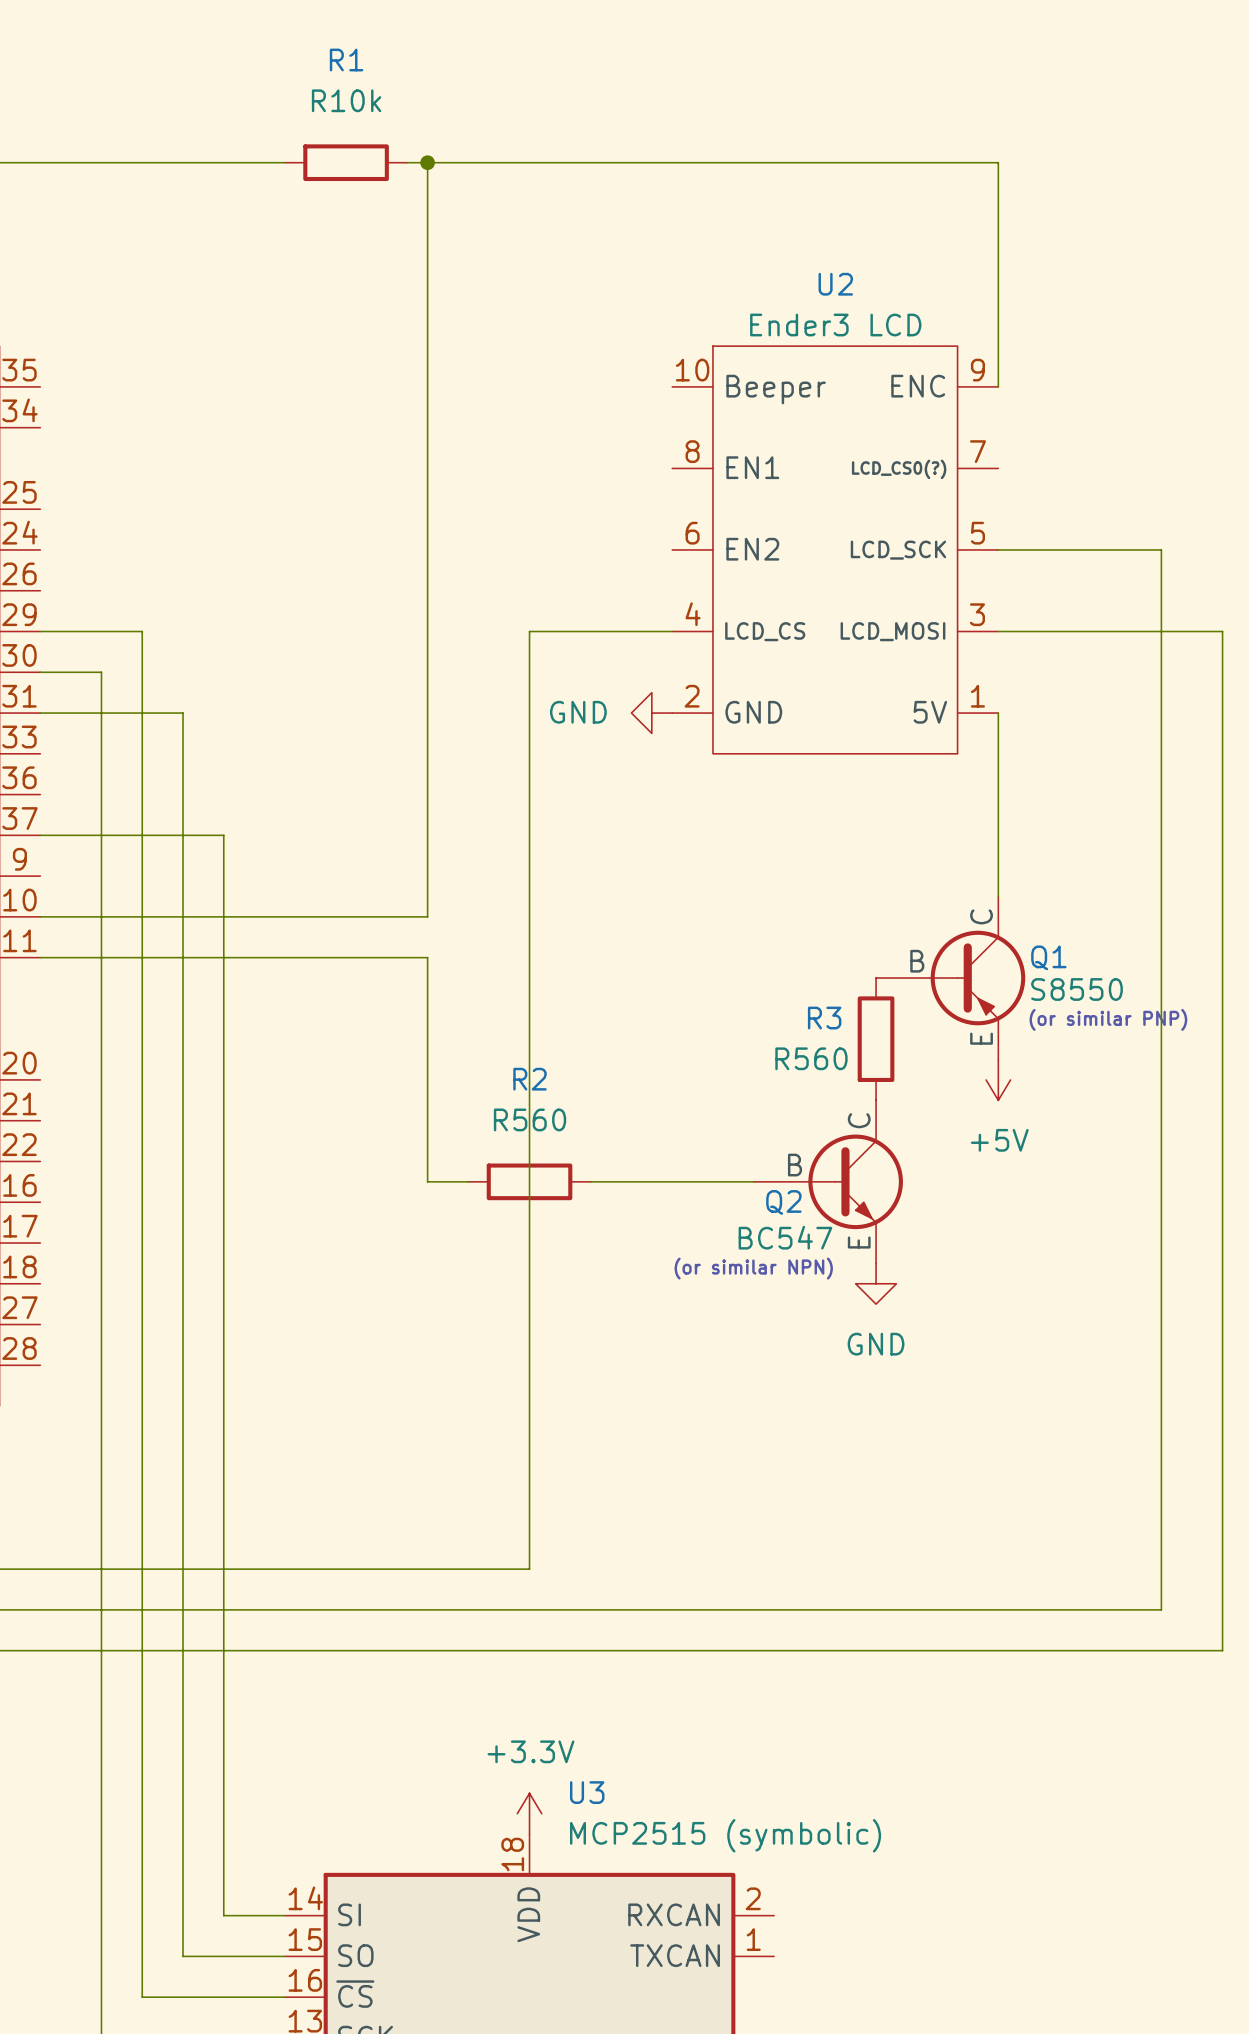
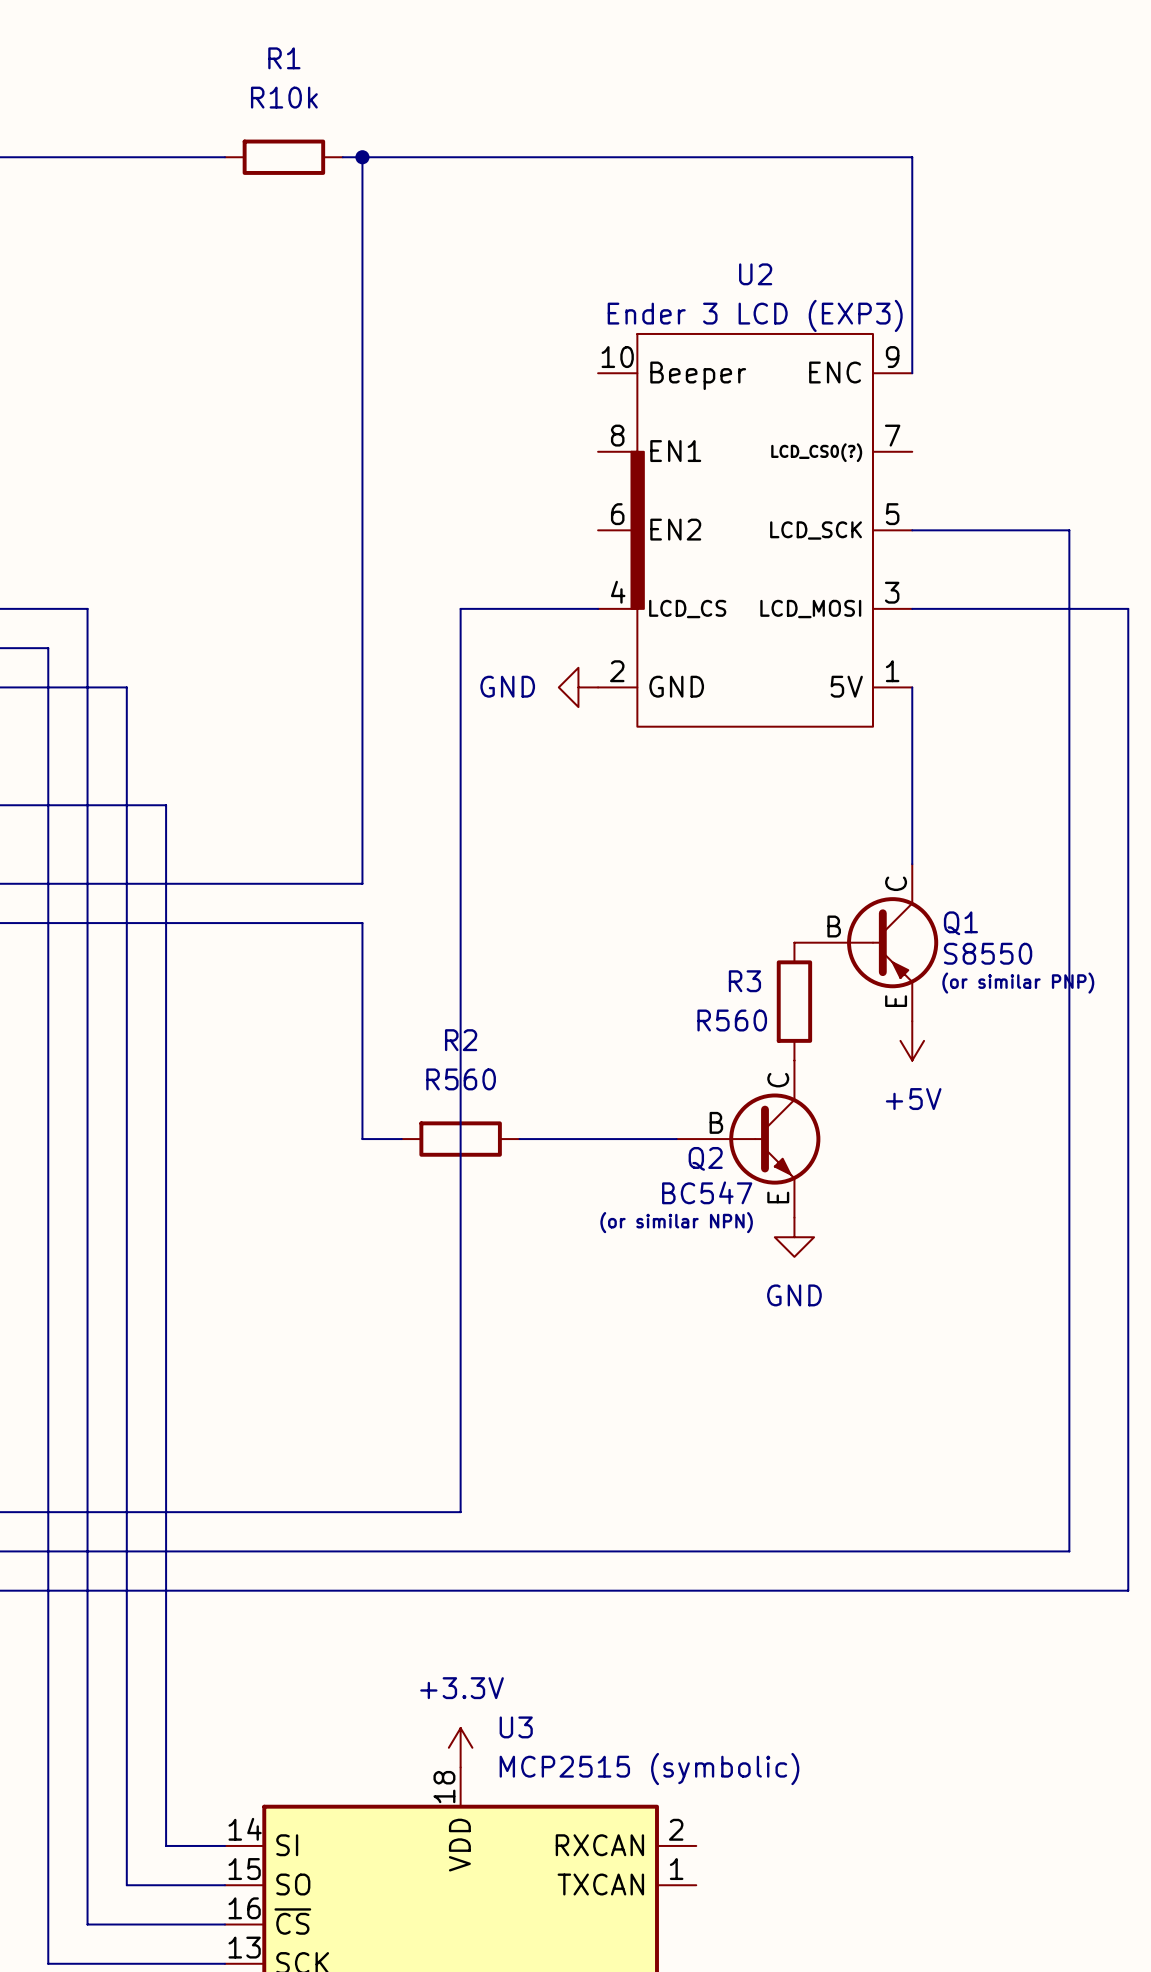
U2 value: Ender3 LCD (835, 325) -> Ender 3 LCD (EXP3) (755, 315)
U2 symbol: [672, 346, 999, 754] -> [598, 333, 913, 727]

